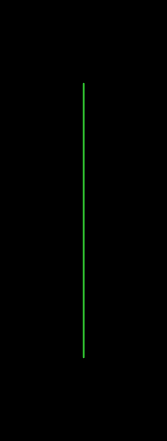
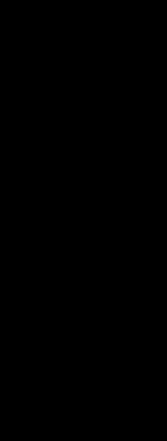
wire: (83, 83) (83, 357) -> none

